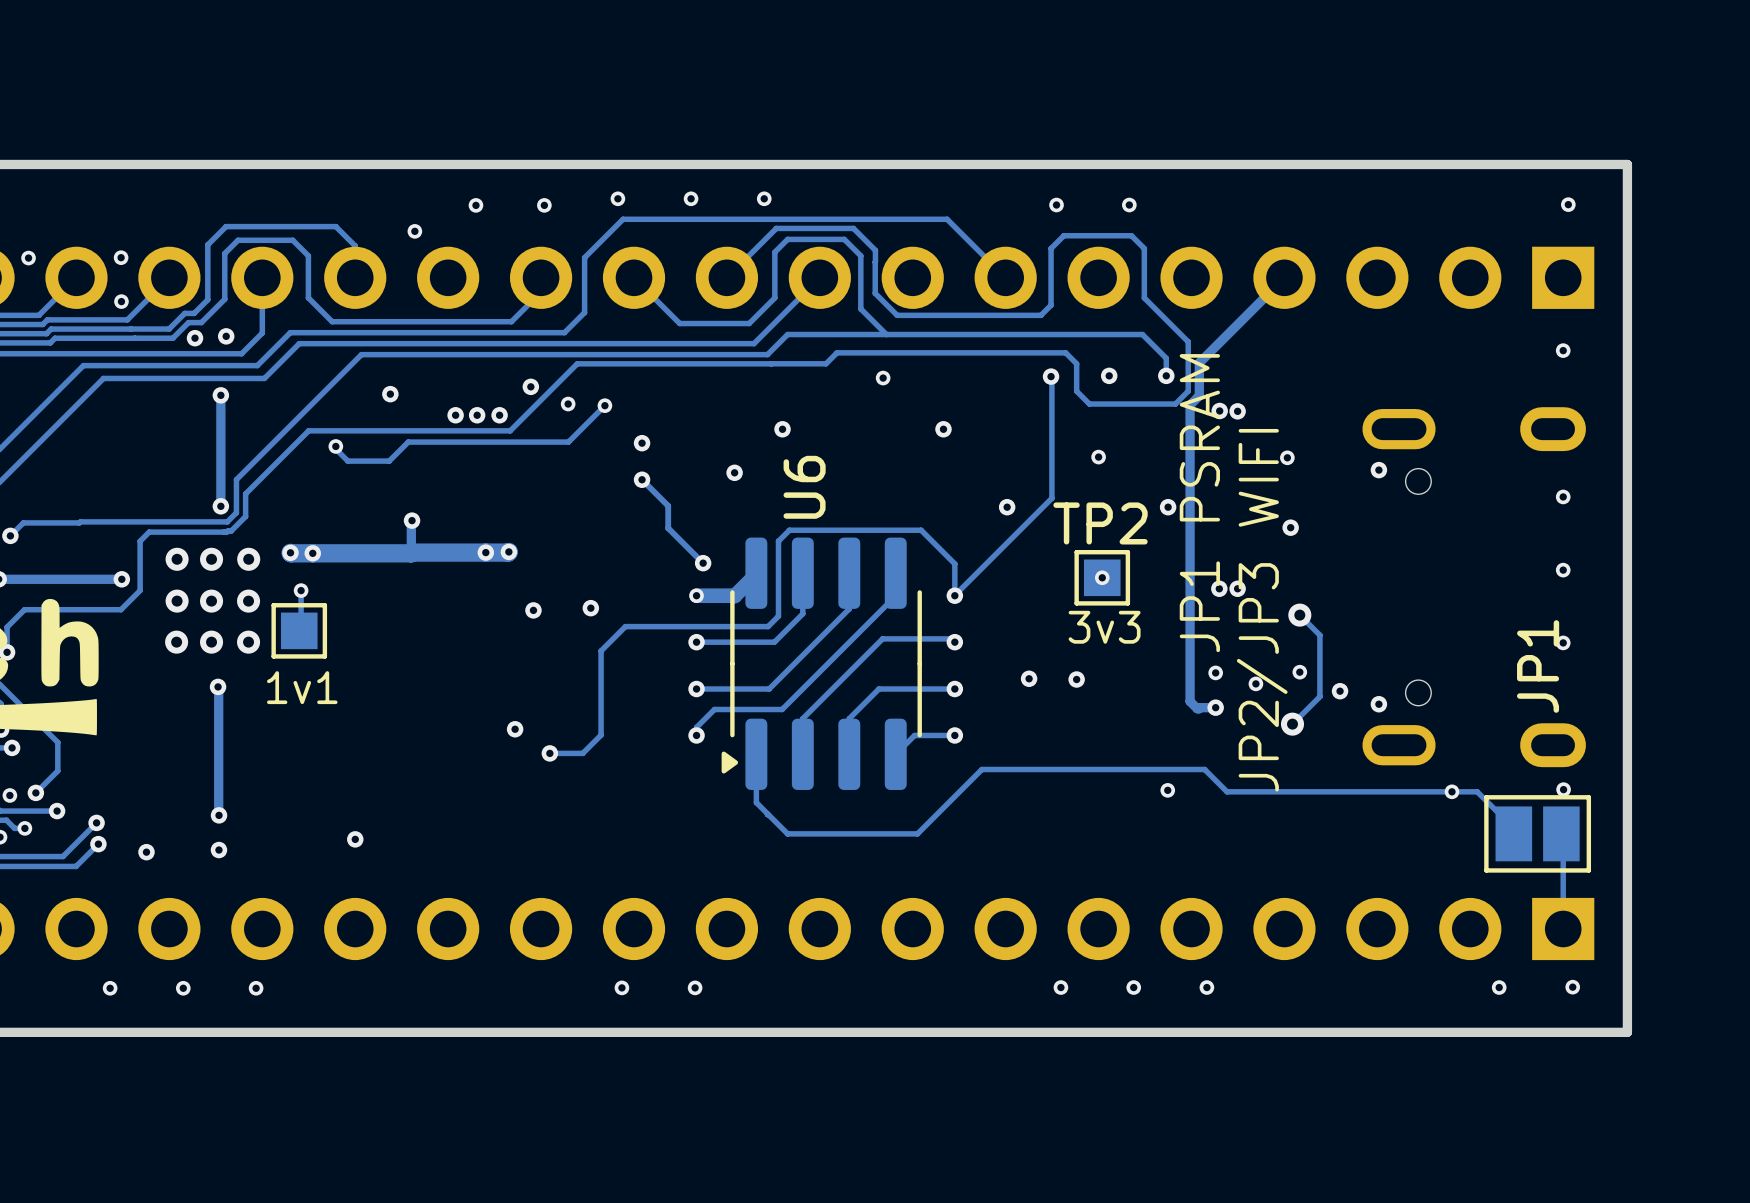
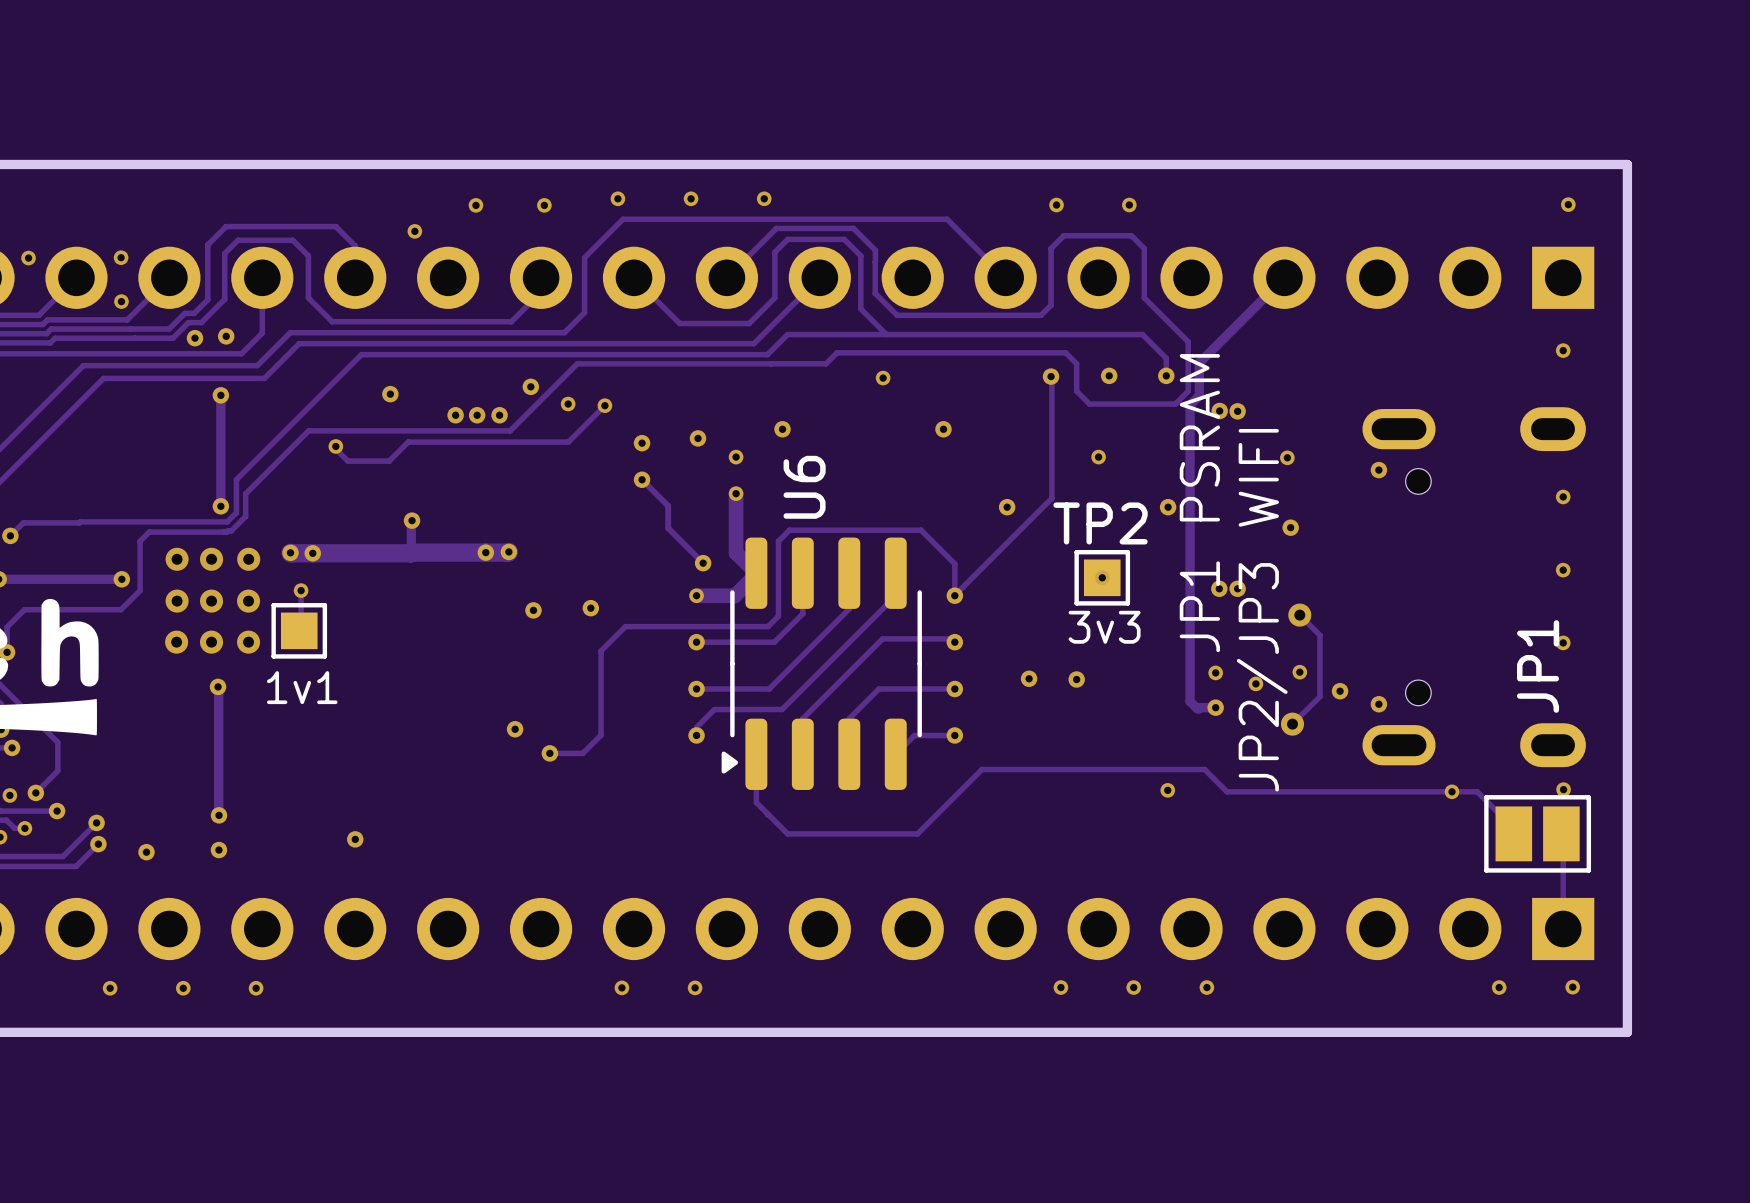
via: none -> (736, 457)
via position: (734, 472) -> (698, 438)
track: none -> (736, 493) (736, 552) (756, 573)
via: none -> (736, 493)

